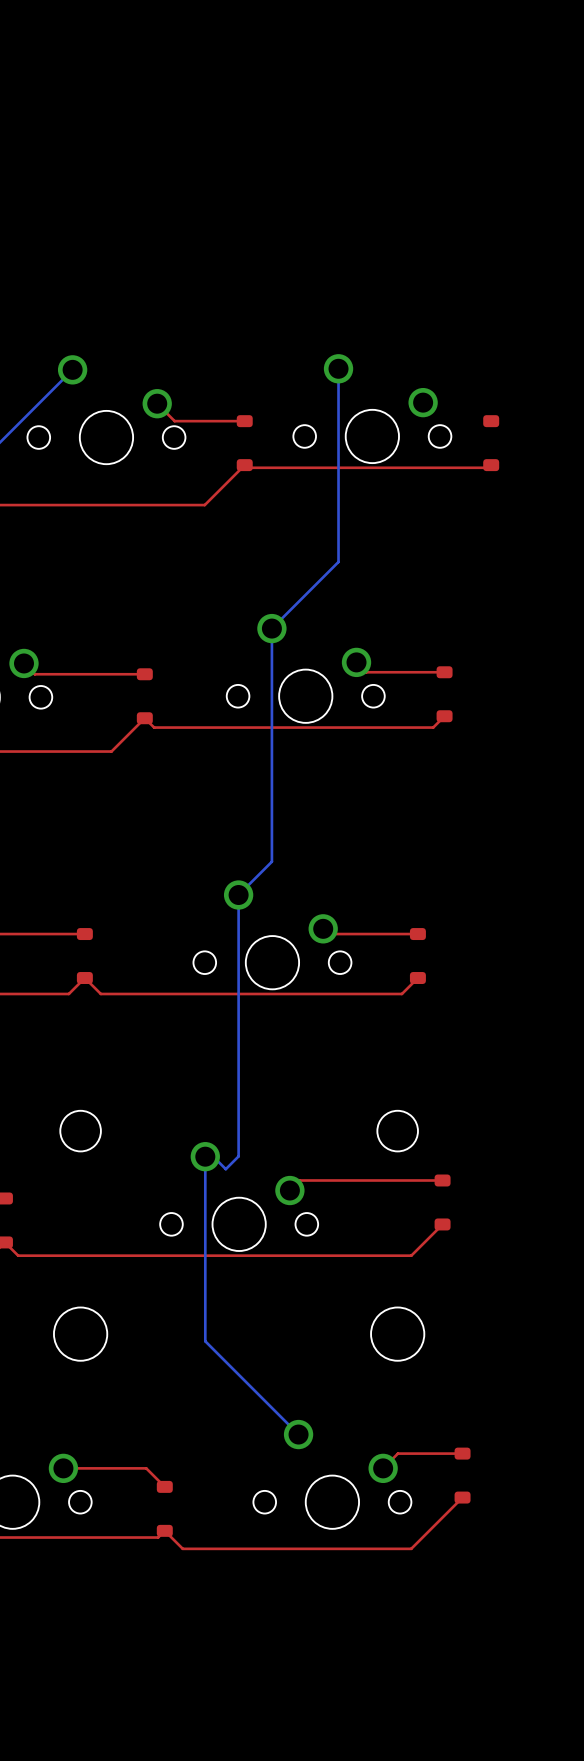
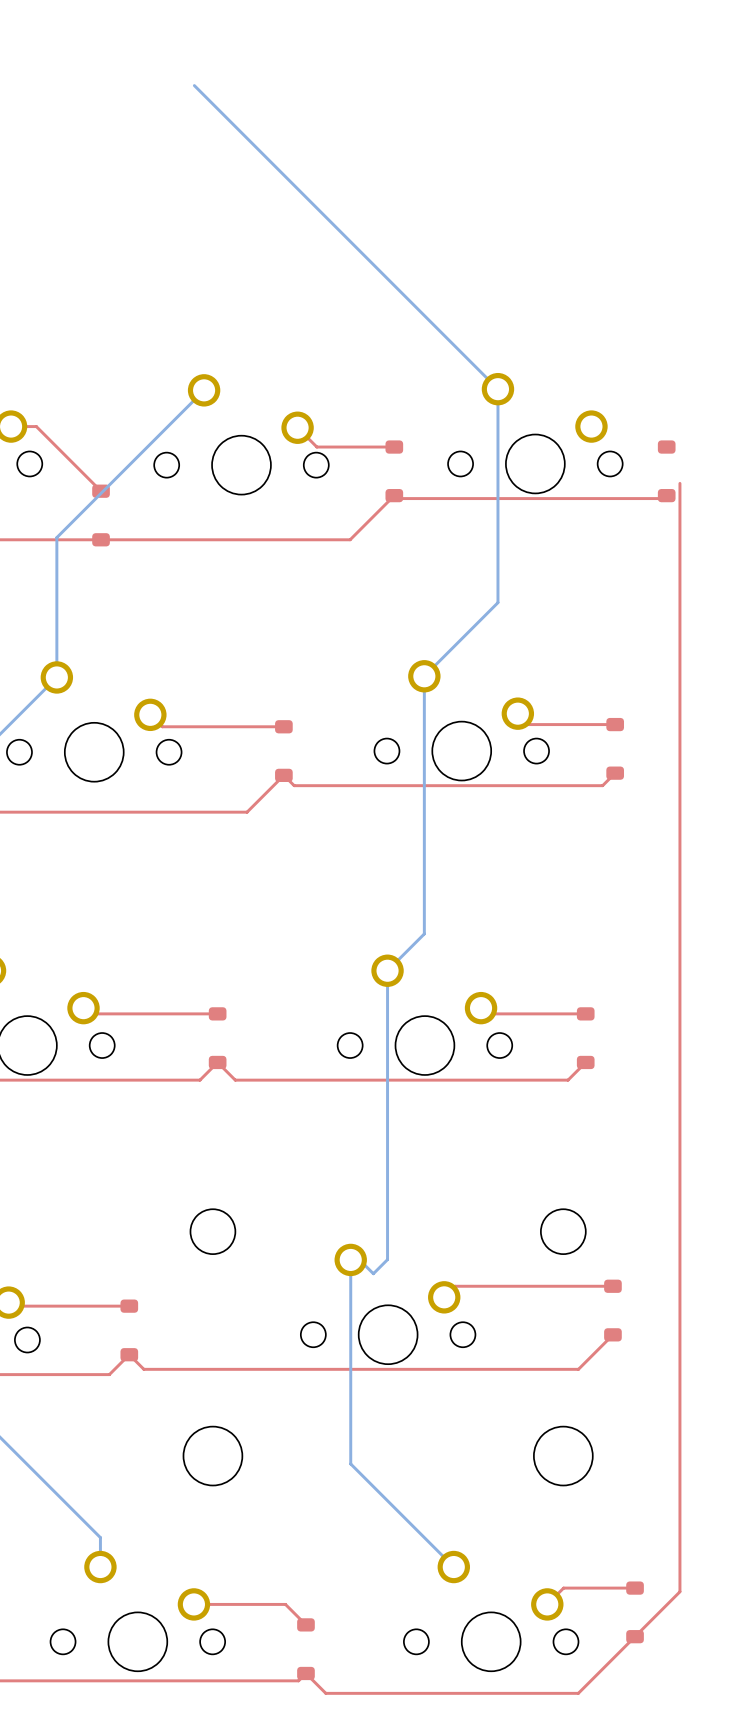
bottom track: none -> (194, 85) (497, 389)
top track: none -> (679, 483) (679, 1591) (635, 1636)

